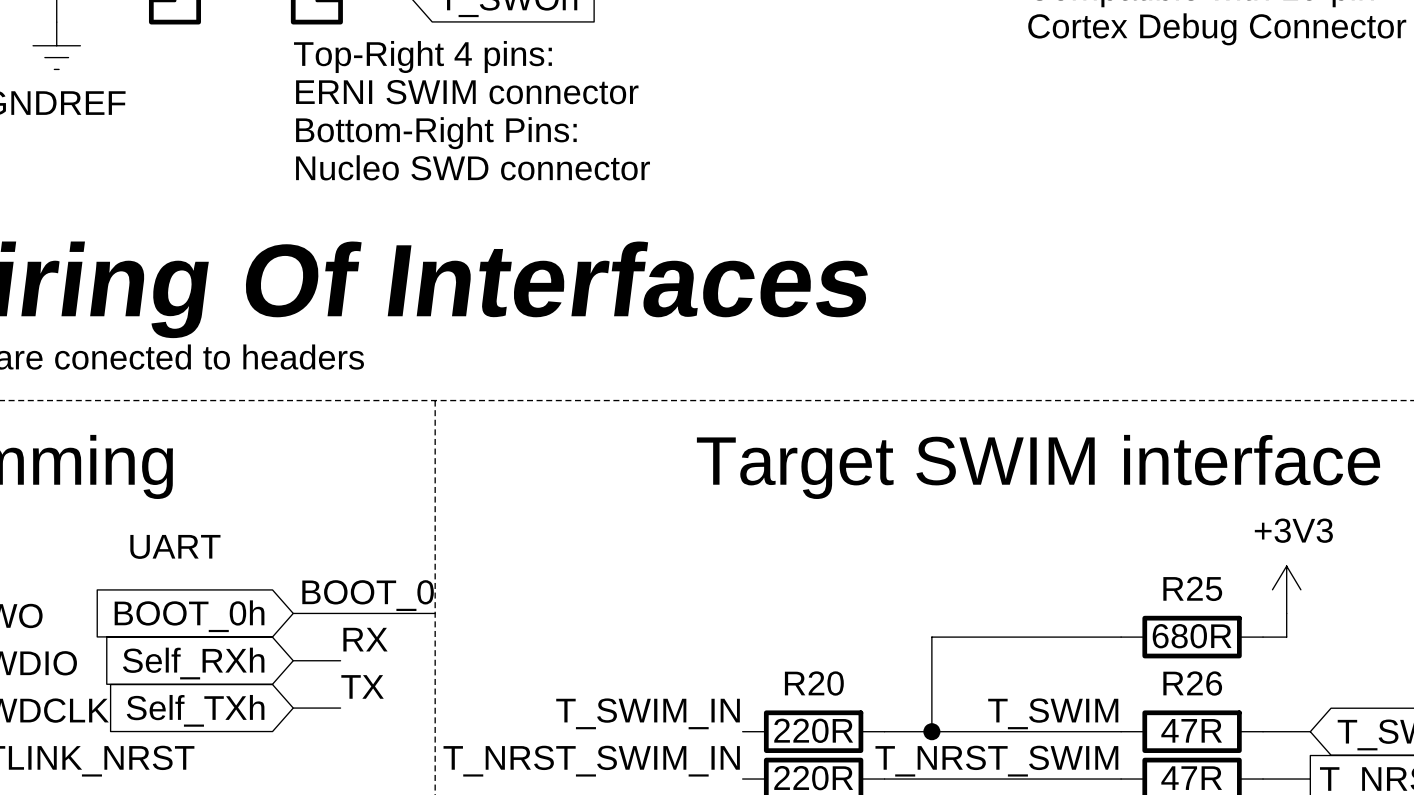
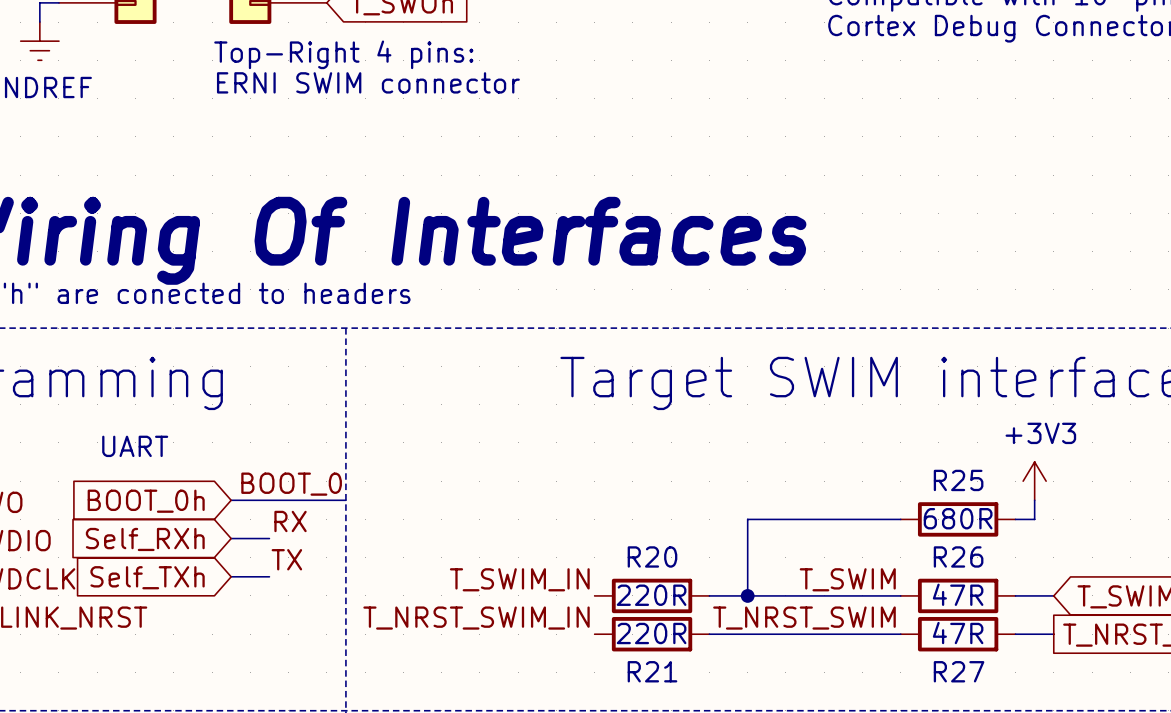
text position: Top-Right 4 pins: (422, 56) -> Top-Right 4 pins: (343, 54)
text position: ERNI SWIM connector (467, 92) -> ERNI SWIM connector (368, 82)
text: Bottom-Right Pins: (436, 133) -> none
text: Nucleo SWD connector (473, 167) -> none

